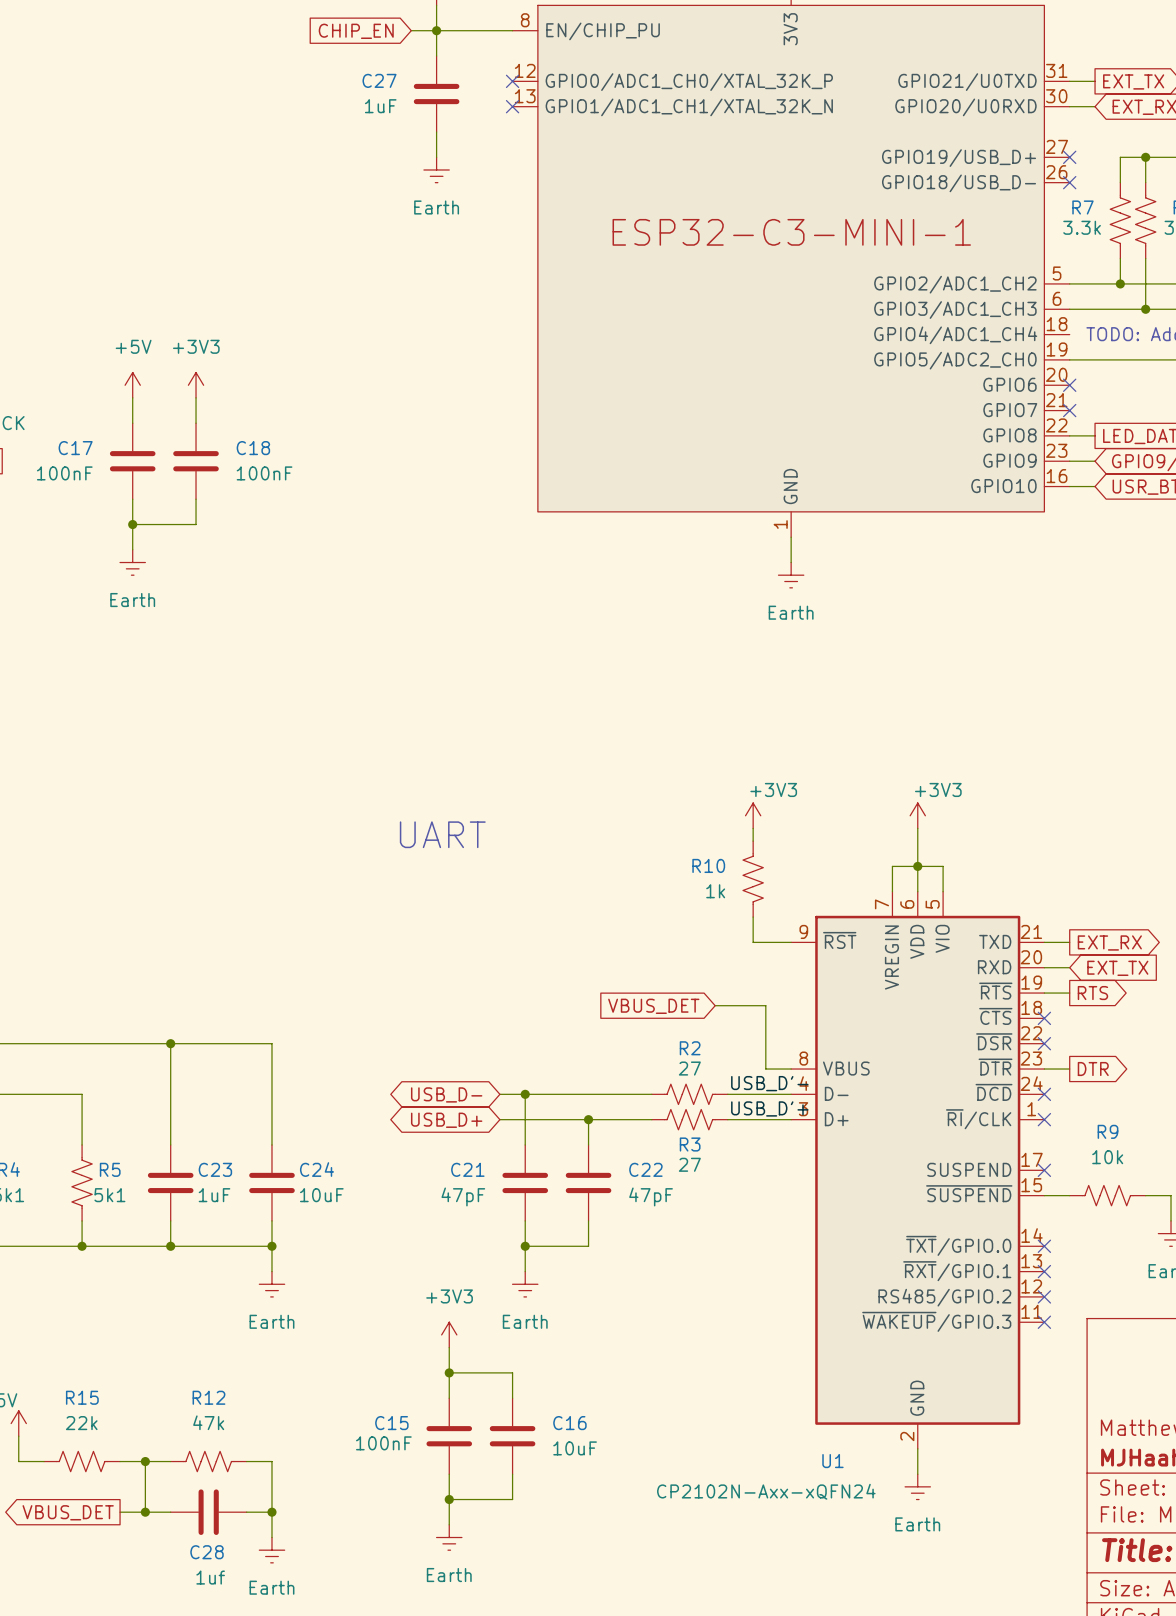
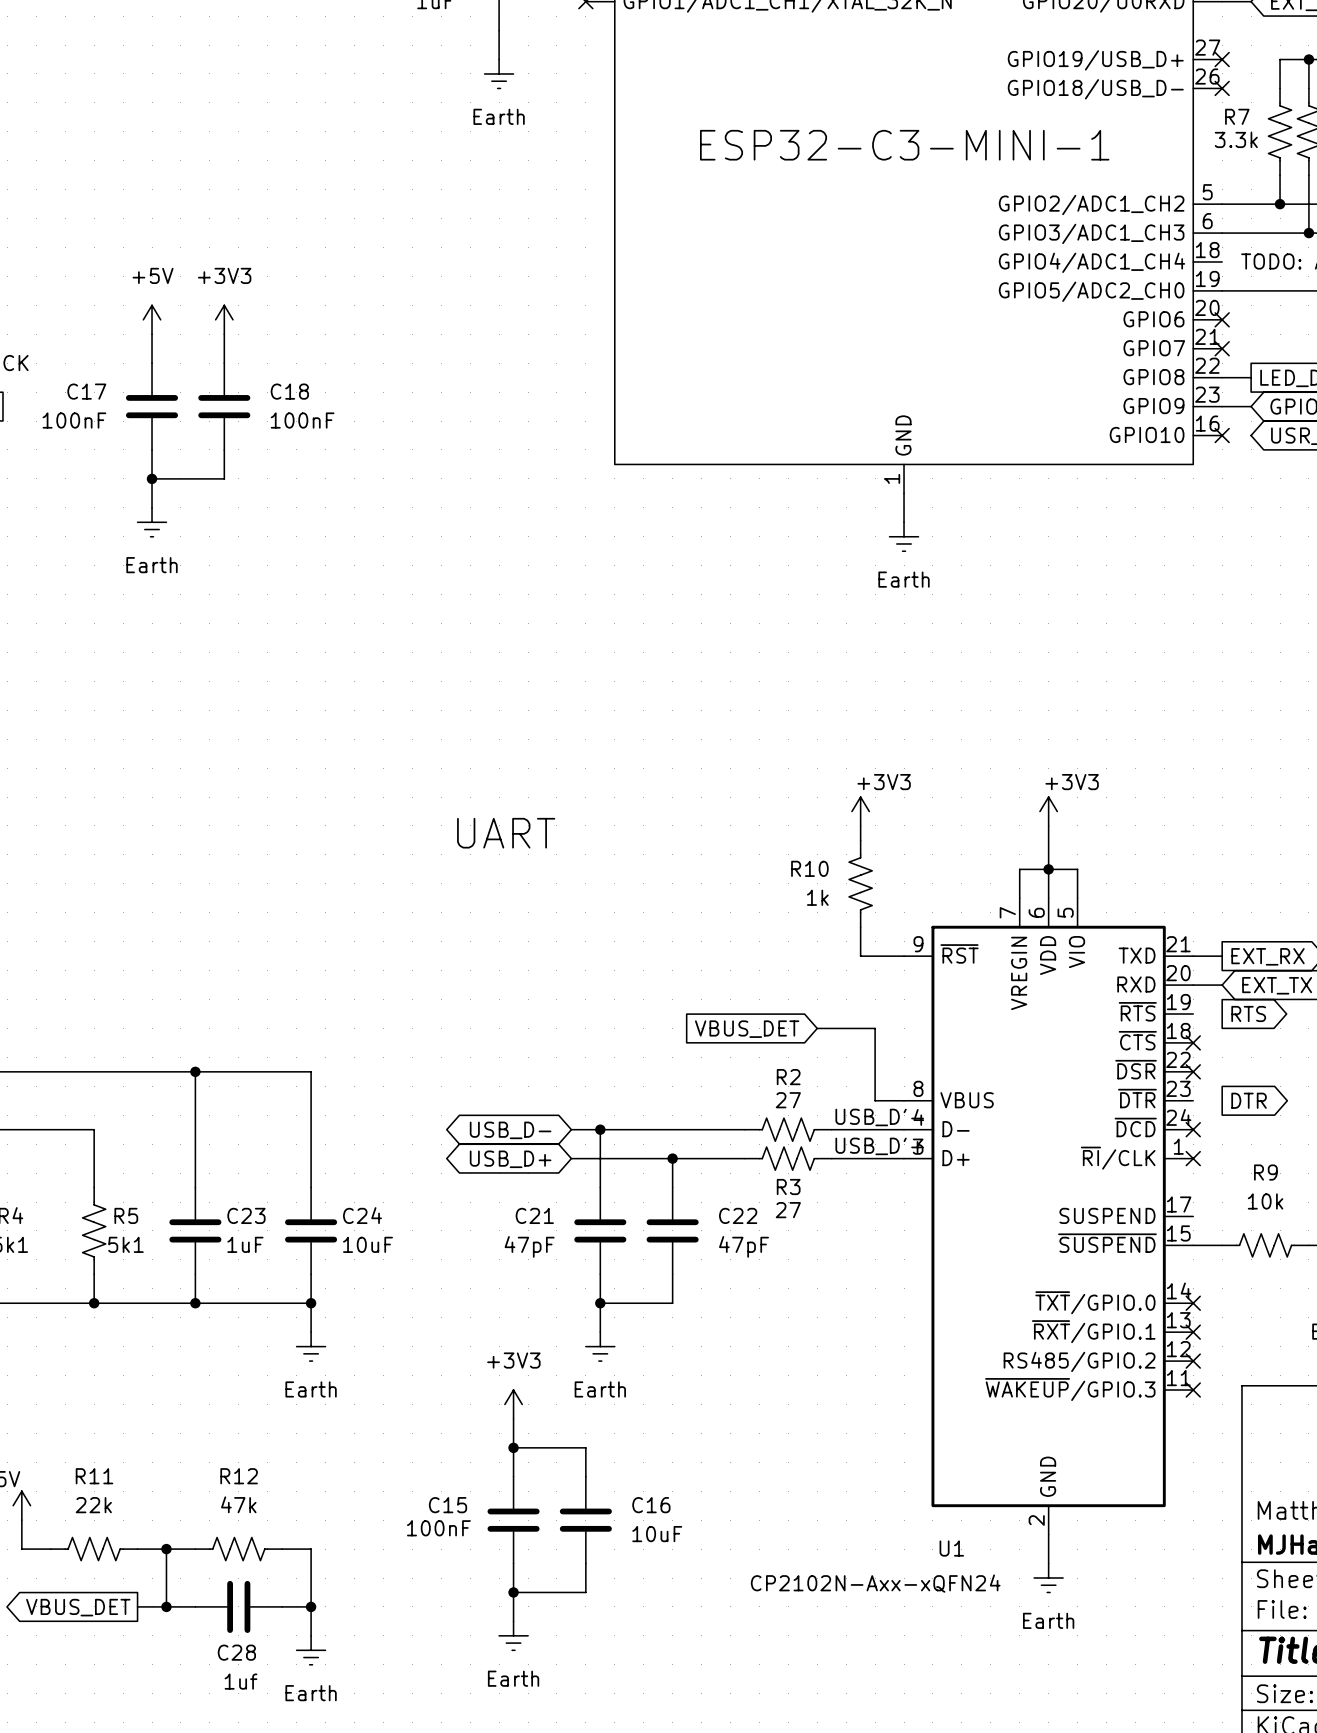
wire: (1069, 486) (1095, 486) -> none
no-connect mark: none -> (1222, 435)
wire: (1044, 993) (1069, 993) -> none
wire: (1044, 1069) (1069, 1069) -> none
no-connect mark: (1044, 1170) -> none
R15 name: R15 (82, 1397) -> R11 (94, 1476)

